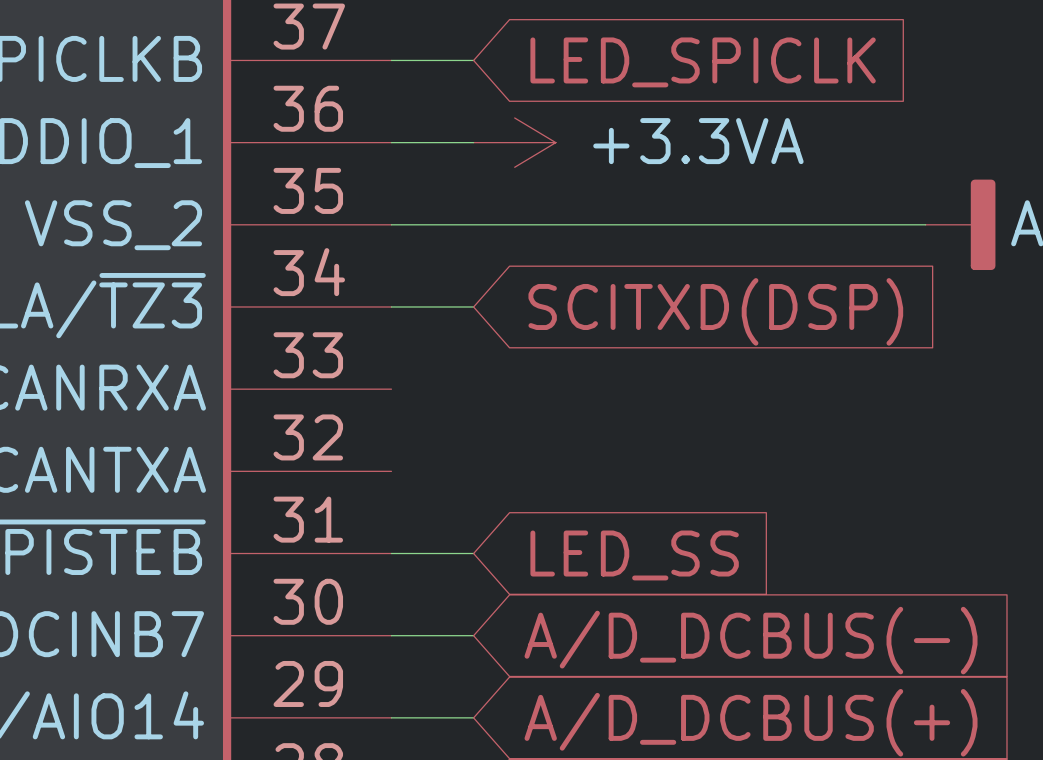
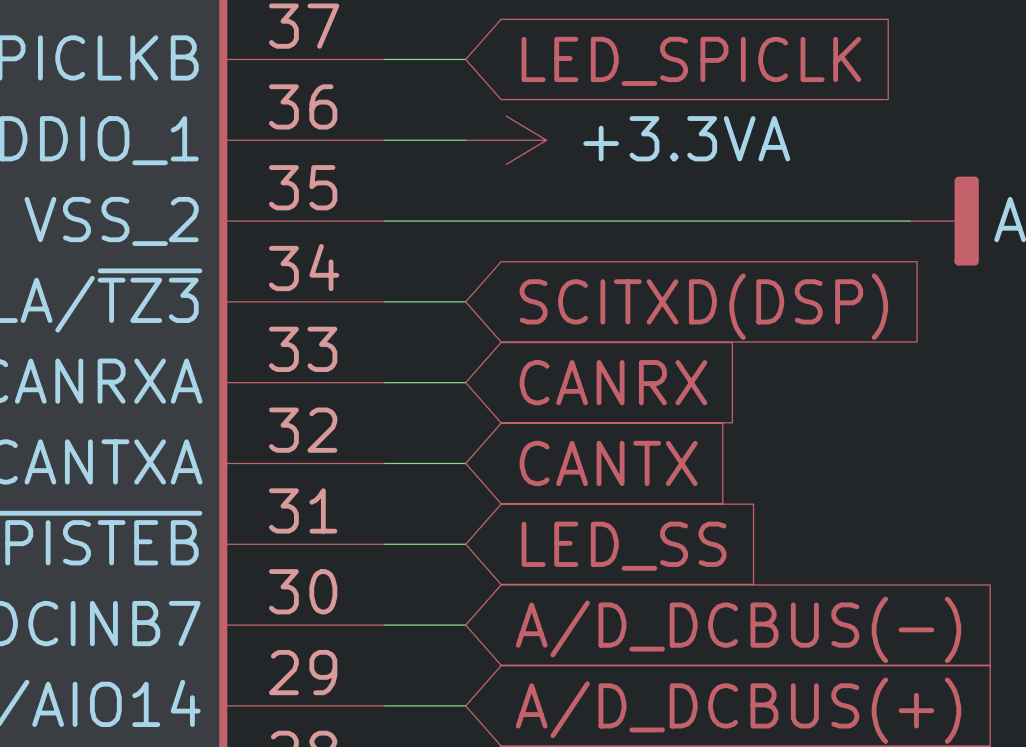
wire: none -> (384, 382) (465, 382)
global label: none -> CANRX (613, 382)
wire: none -> (384, 463) (465, 463)
global label: none -> CANTX (608, 463)

